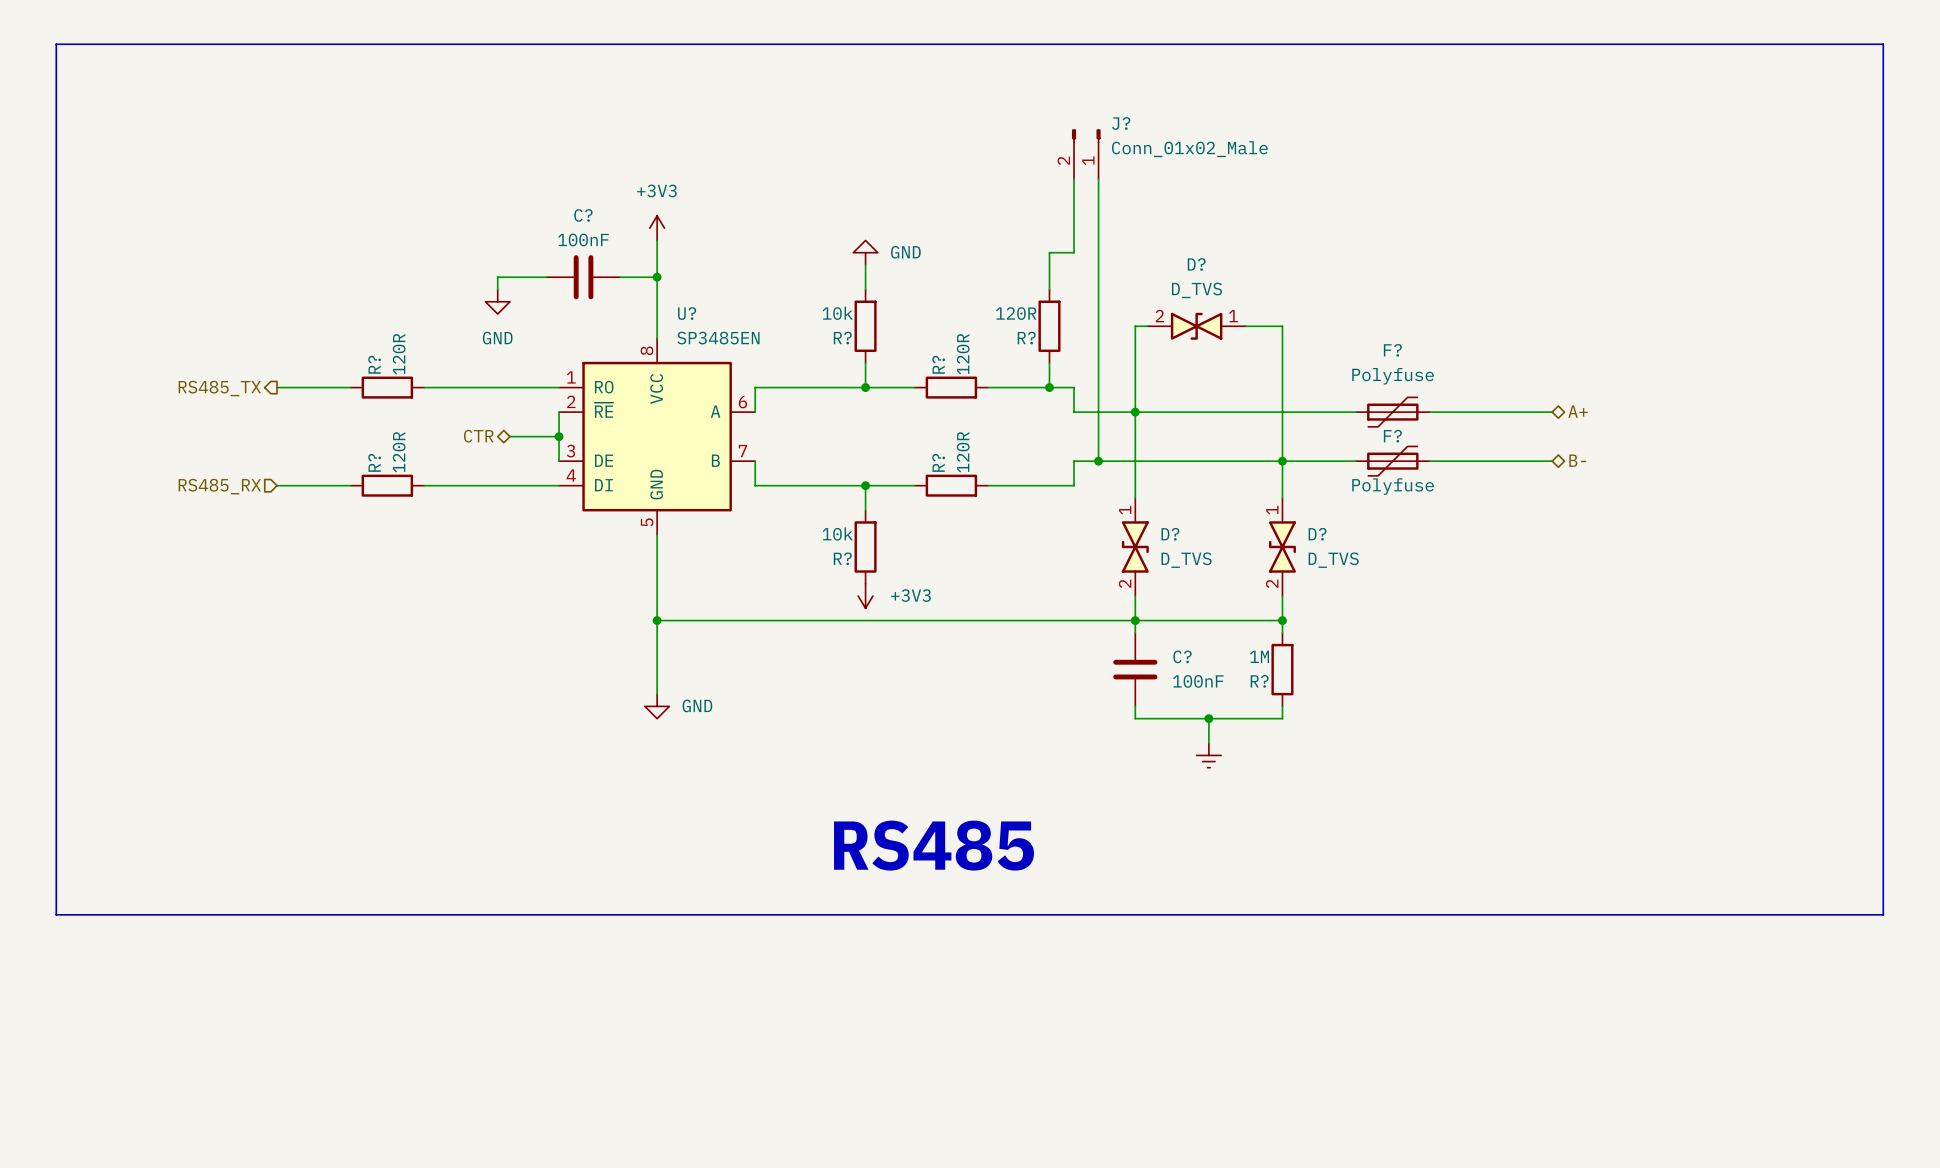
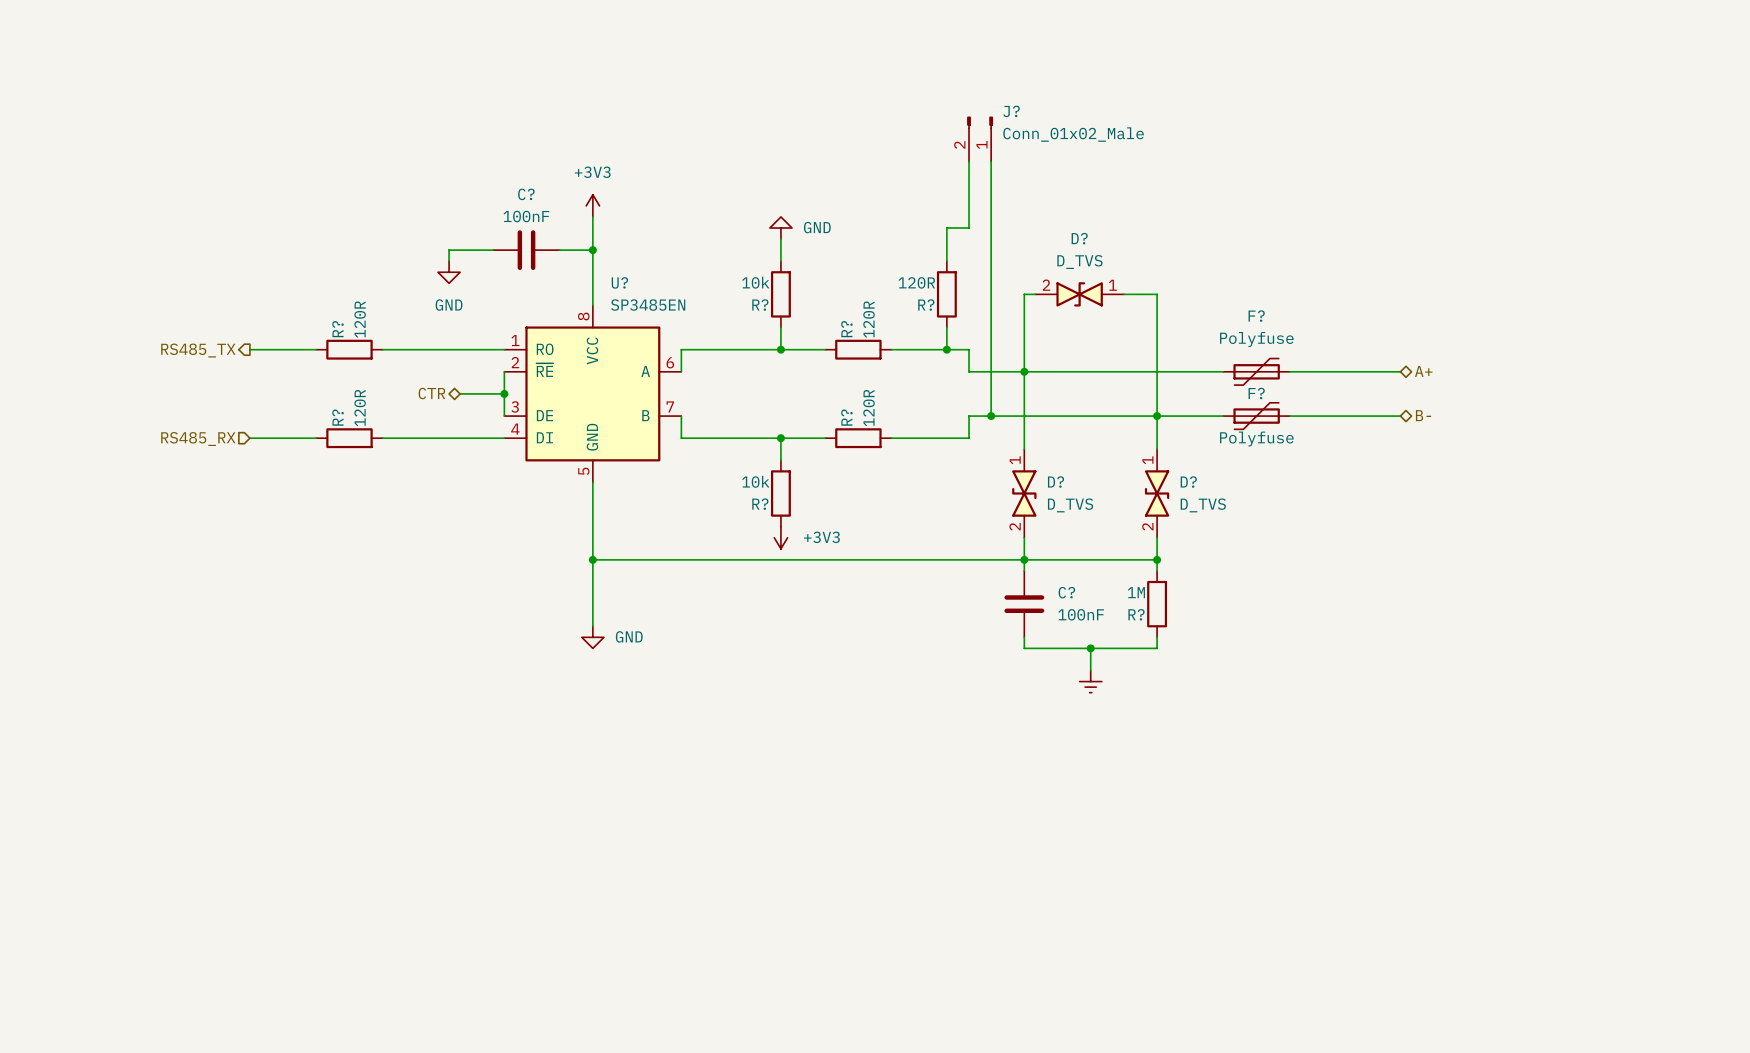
line: (56, 44) (56, 914) (1883, 914) (1883, 44) (56, 44) -> none
text: RS485 (934, 845) -> none

